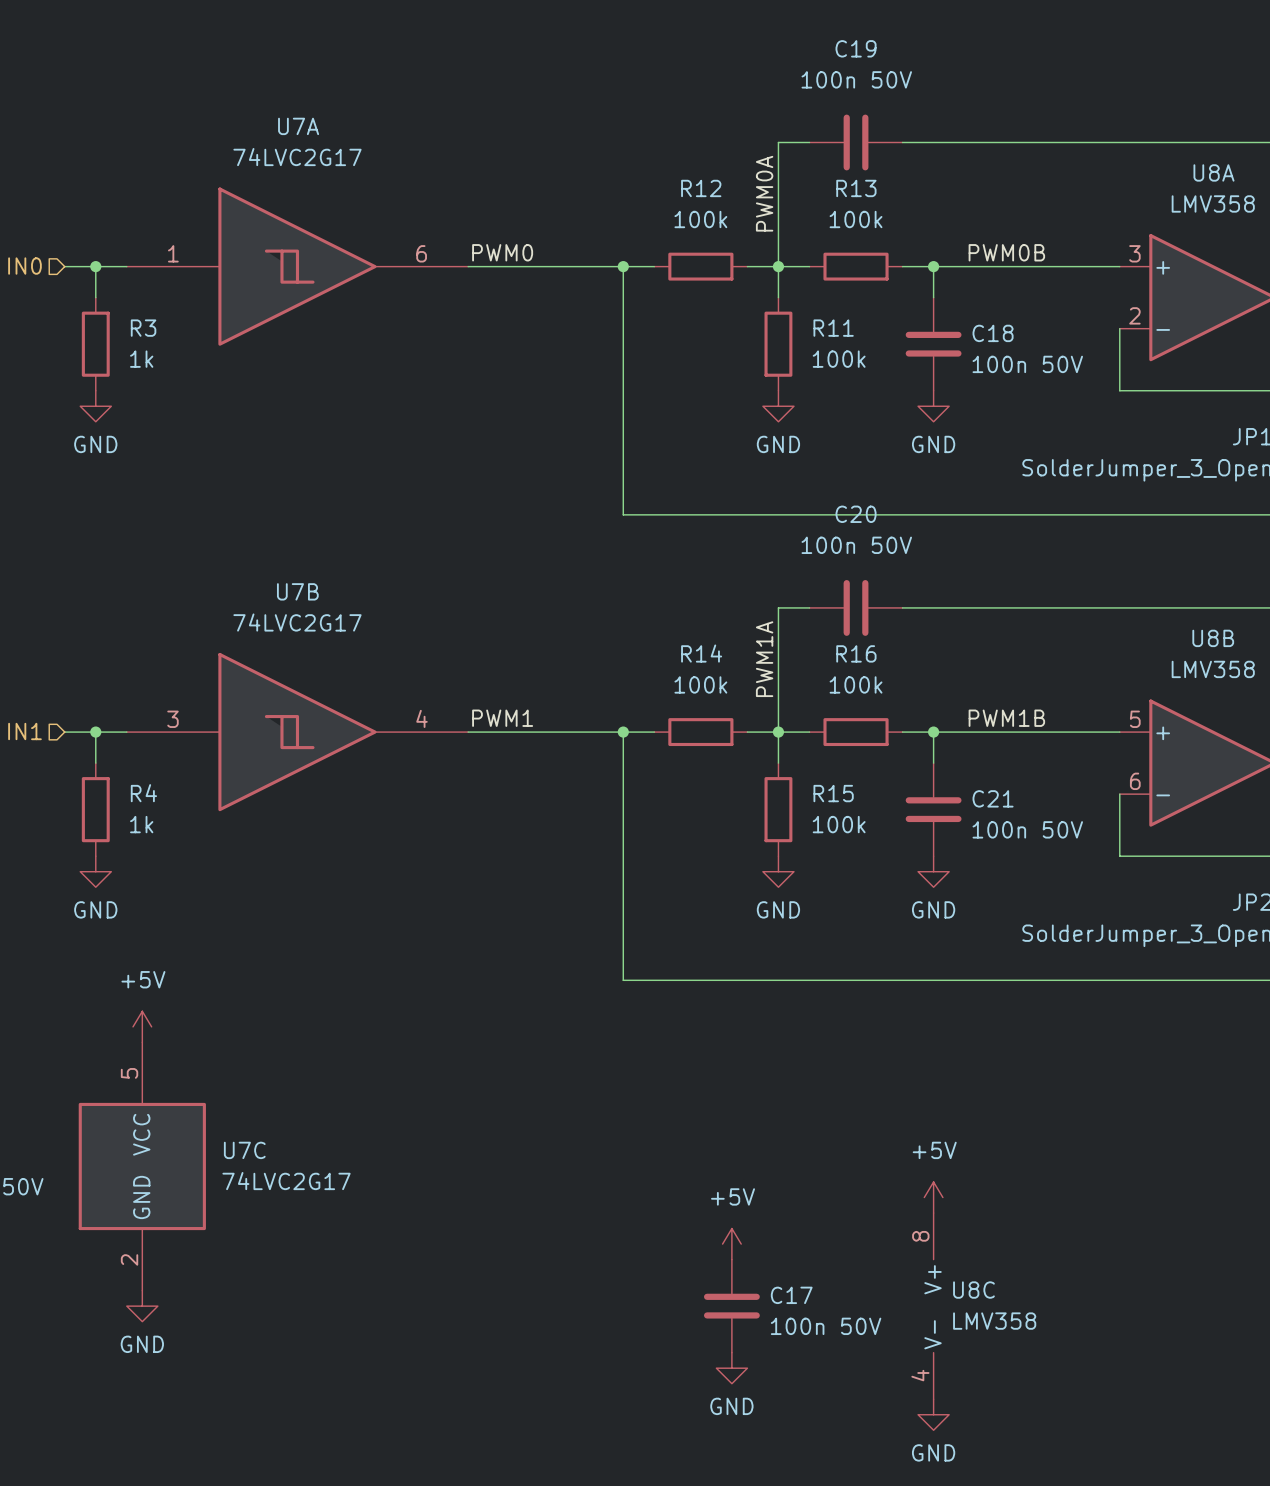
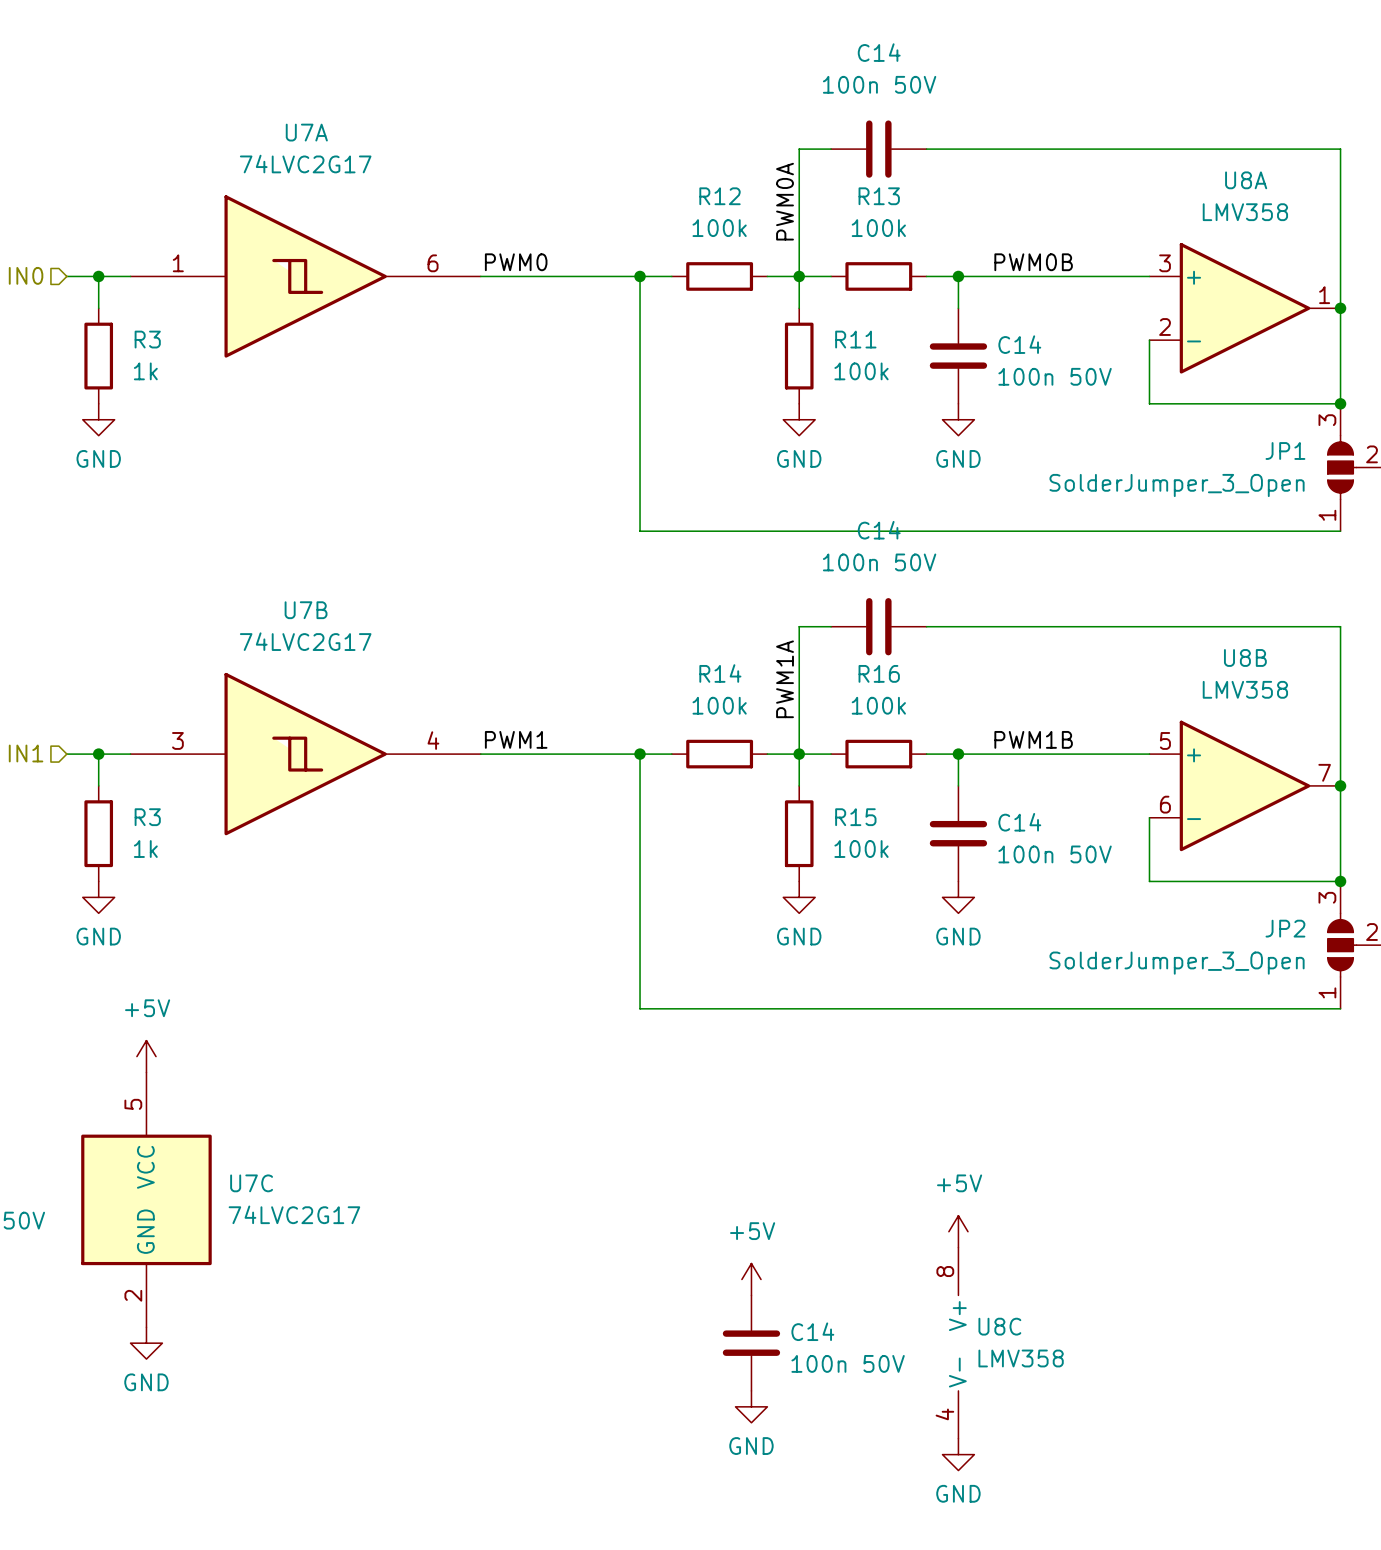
C19 name: C19 (856, 48) -> C14 (879, 52)
C18 name: C18 (993, 333) -> C14 (1019, 344)
C20 name: C20 (856, 514) -> C14 (879, 530)
R4 name: R4 (143, 793) -> R3 (147, 817)
C21 name: C21 (993, 798) -> C14 (1019, 822)
C17 name: C17 (791, 1295) -> C14 (812, 1331)

